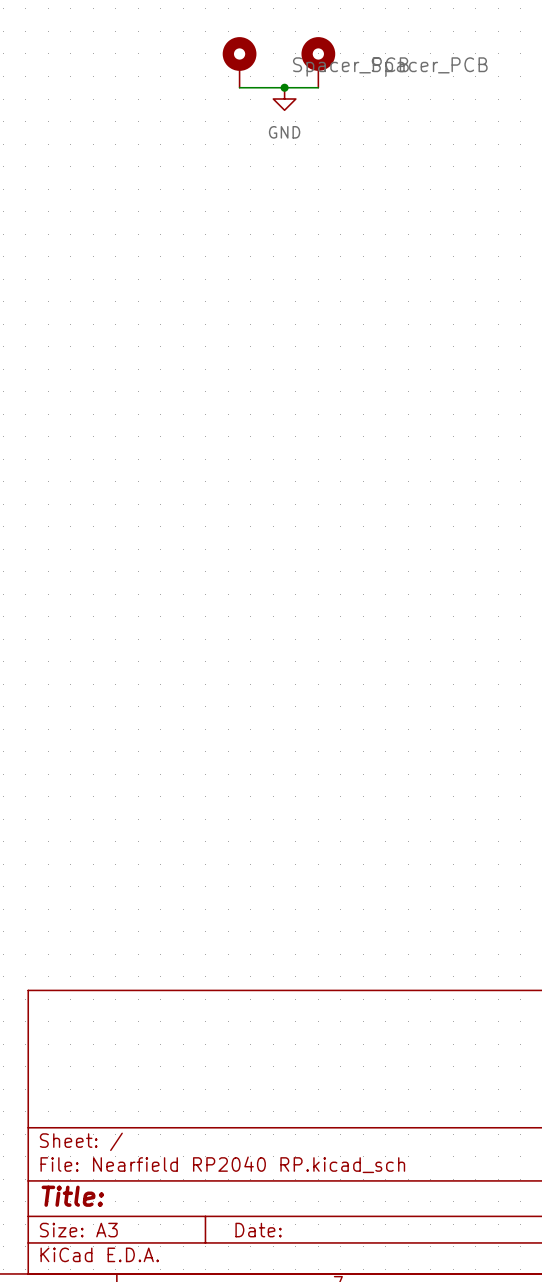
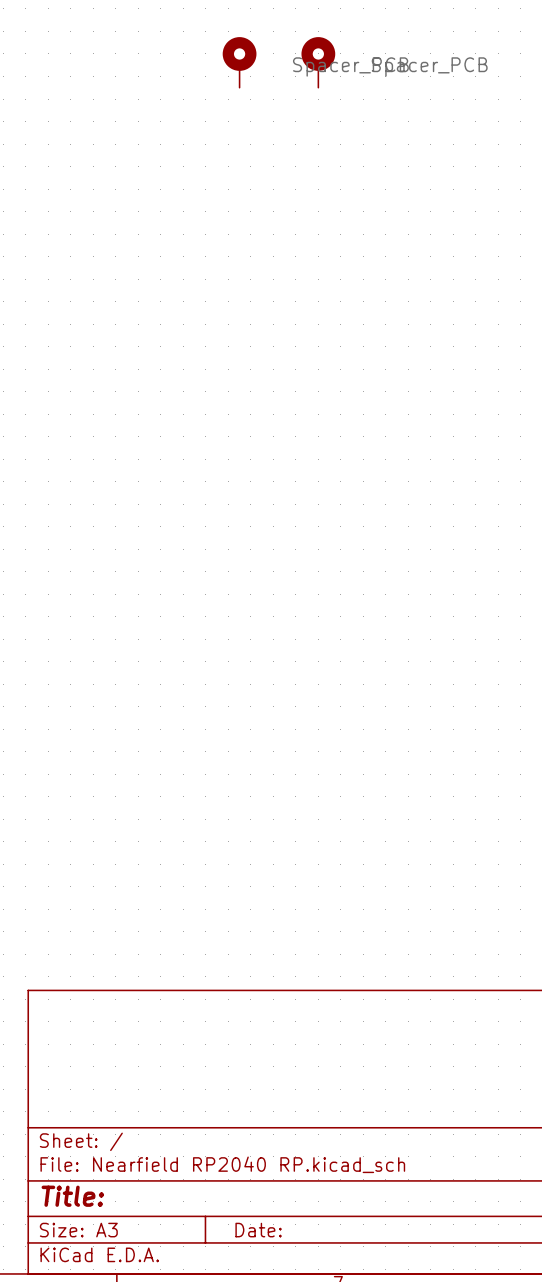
wire: (239, 87) (318, 87) -> none
junction: (284, 87) -> none
power symbol: GND (284, 99) -> none

